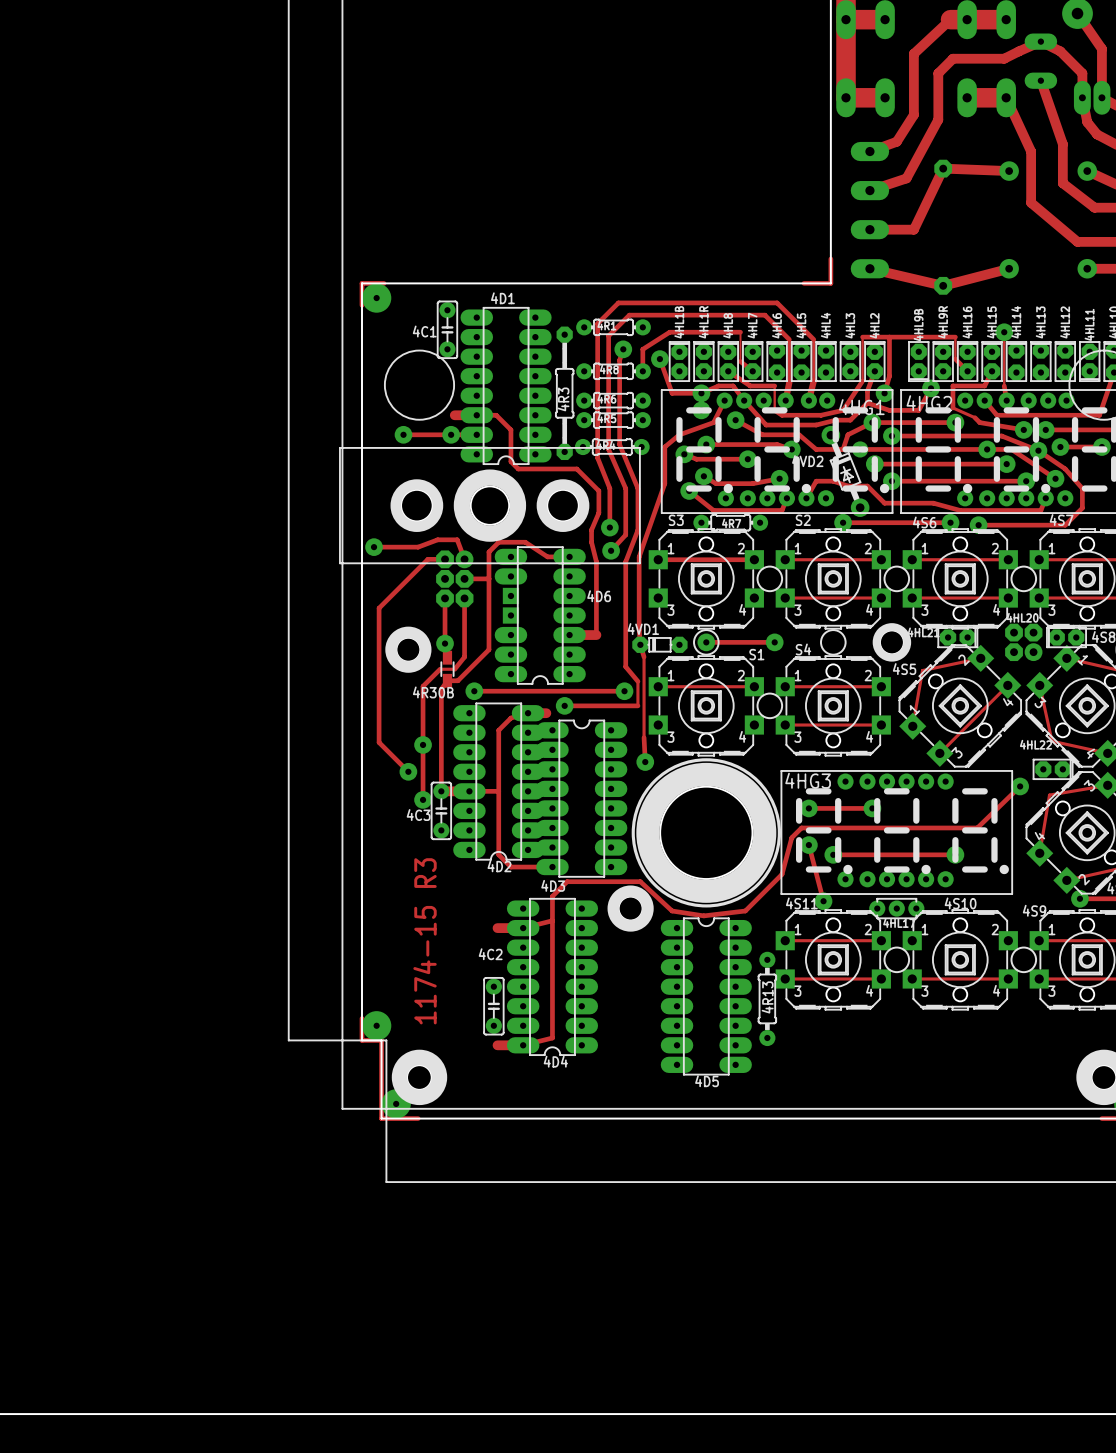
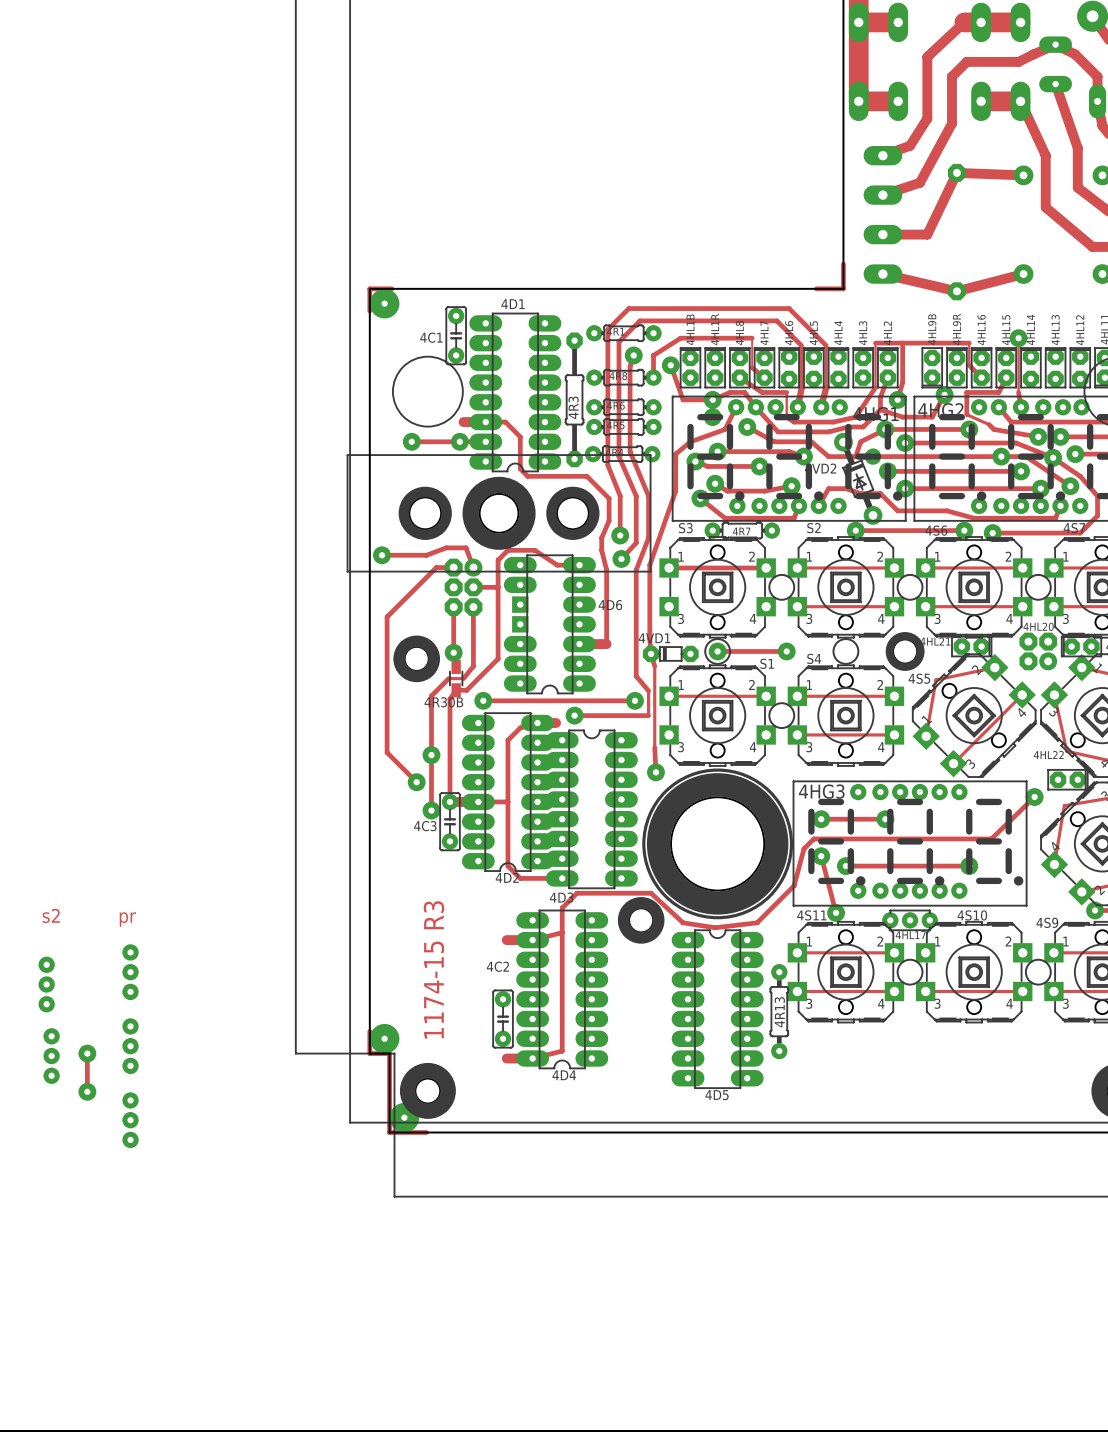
text: none -> s2 (51, 915)
text: none -> pr (127, 919)
part: none -> (130, 972)
part: none -> (46, 984)
part: none -> (130, 1046)
track: none -> (87, 1053) (87, 1091)
via: none -> (87, 1053)
part: none -> (51, 1056)
via: none -> (87, 1091)
part: none -> (130, 1120)

